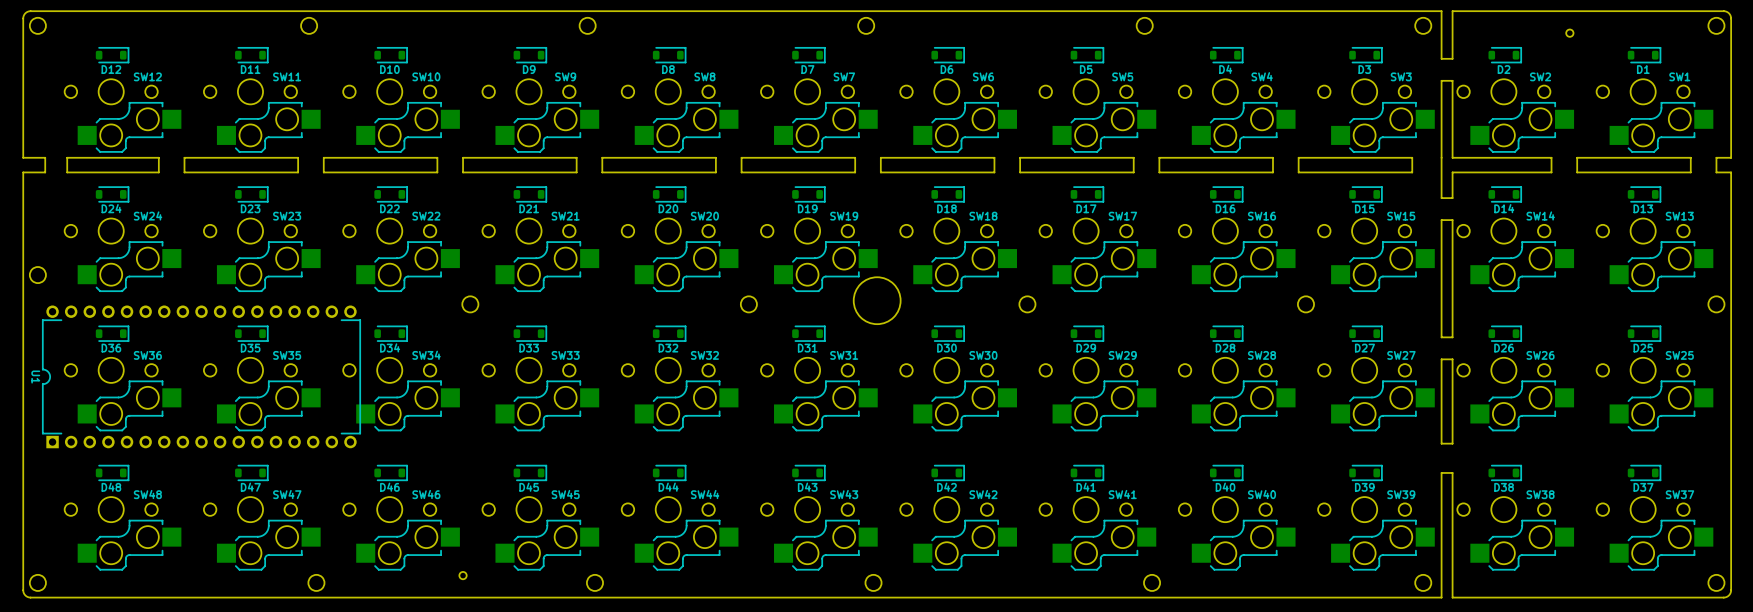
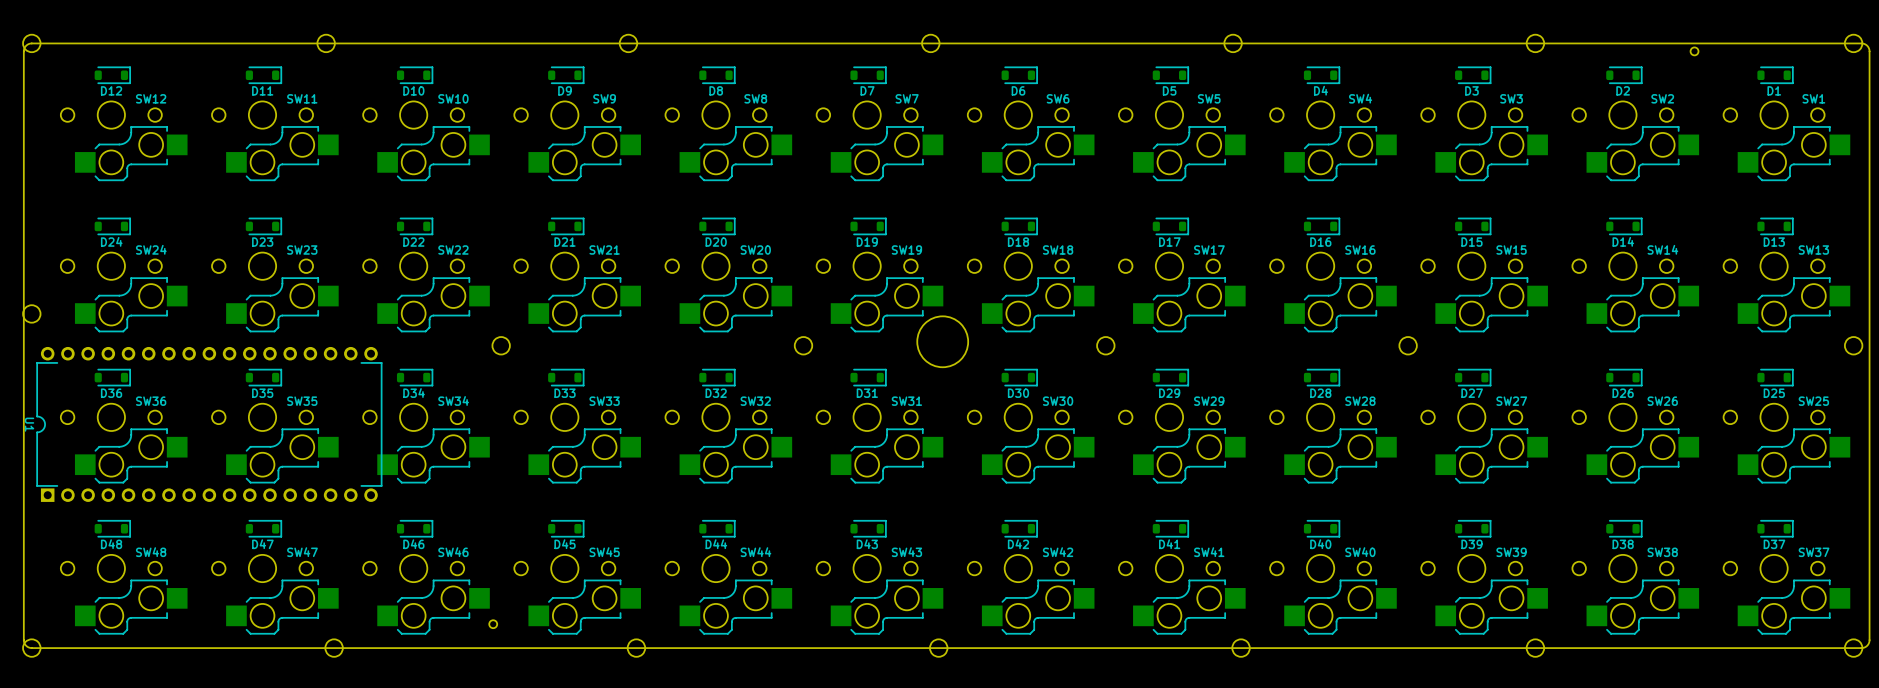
board edge: (1731, 33) (1730, 16) (1724, 11) (1452, 11) (1452, 58) (1441, 58) (1441, 11) (30, 11) (25, 13) (23, 18) (23, 157) (45, 157) (45, 172) (23, 172) (23, 590) (28, 597) (1441, 597) (1441, 472) (1452, 472) (1452, 597) (1724, 597) (1730, 592) (1731, 575) -> (1869, 51) (1867, 45) (1861, 43) (31, 43) (26, 45) (23, 51) (23, 640) (29, 647) (1861, 648) (1867, 645) (1869, 640)
board edge: (1452, 80) (1452, 157) (1551, 157) (1551, 172) (1452, 172) (1452, 198) (1441, 198) (1441, 80) (1452, 80) -> none
board edge: (158, 157) (67, 157) (67, 172) (158, 172) (158, 157) -> none
board edge: (298, 157) (184, 157) (184, 172) (298, 172) (298, 157) -> none
board edge: (437, 157) (323, 157) (323, 172) (437, 172) (437, 157) -> none
board edge: (576, 157) (576, 172) (463, 172) (463, 157) (576, 157) -> none
board edge: (715, 157) (602, 157) (602, 172) (715, 172) (715, 157) -> none
board edge: (855, 157) (741, 157) (741, 172) (855, 172) (855, 157) -> none
board edge: (994, 157) (880, 157) (880, 172) (994, 172) (994, 157) -> none
board edge: (1133, 157) (1020, 157) (1020, 172) (1133, 172) (1133, 157) -> none
board edge: (1272, 157) (1159, 157) (1159, 172) (1272, 172) (1272, 157) -> none
board edge: (1412, 157) (1298, 157) (1298, 172) (1412, 172) (1412, 157) -> none
board edge: (1690, 157) (1577, 157) (1577, 172) (1690, 172) (1690, 157) -> none
board edge: (1731, 157) (1716, 157) (1716, 172) (1731, 172) -> (1869, 186) (1869, 202)
board edge: (1452, 220) (1452, 337) (1441, 337) (1441, 220) (1452, 220) -> none
board edge: (1452, 359) (1452, 443) (1441, 443) (1441, 359) (1452, 359) -> none
part position: (463, 575) -> (493, 624)

